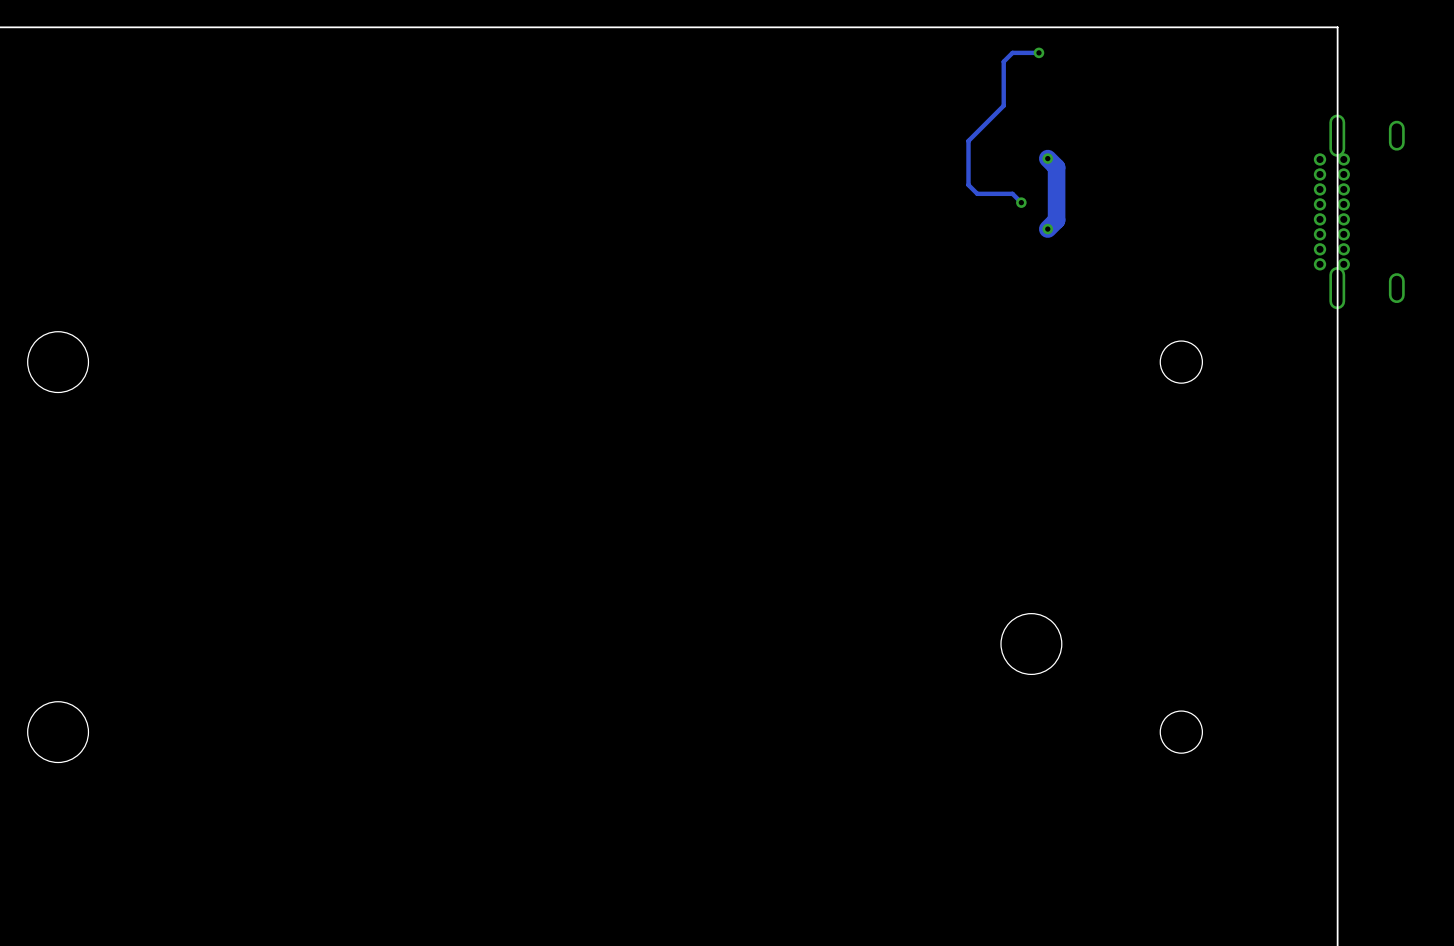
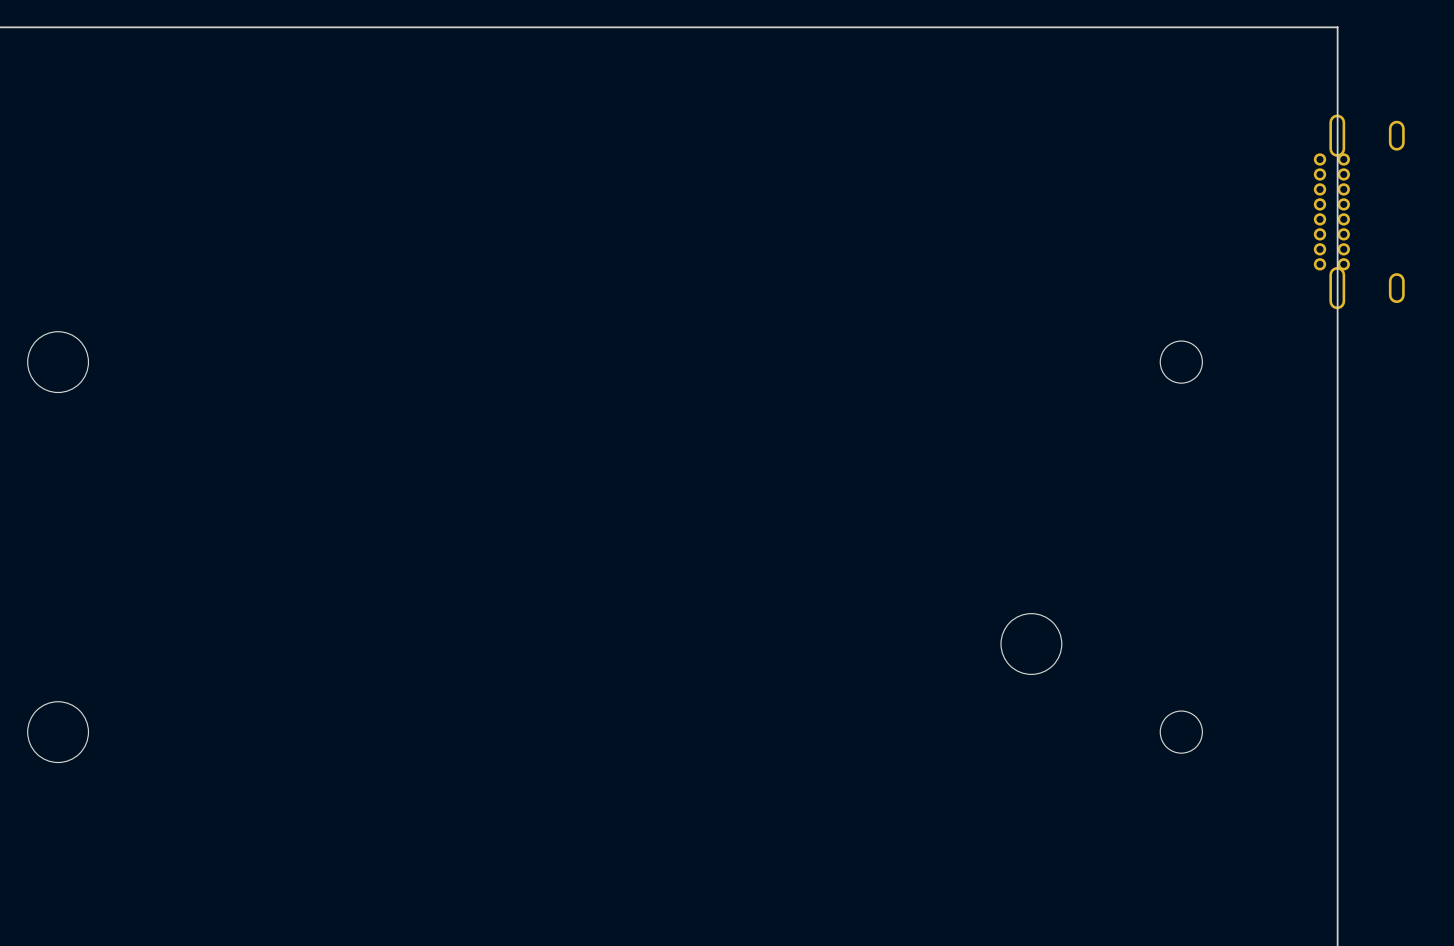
track: (1038, 52) (1012, 52) (1003, 61) (1003, 105) (968, 140) (968, 185) (977, 193) (1012, 193) (1021, 202) -> none
via: (1038, 52) -> none
track: (1047, 158) (1056, 167) (1056, 220) (1047, 229) -> none
via: (1047, 158) -> none
via: (1021, 202) -> none
via: (1047, 229) -> none

